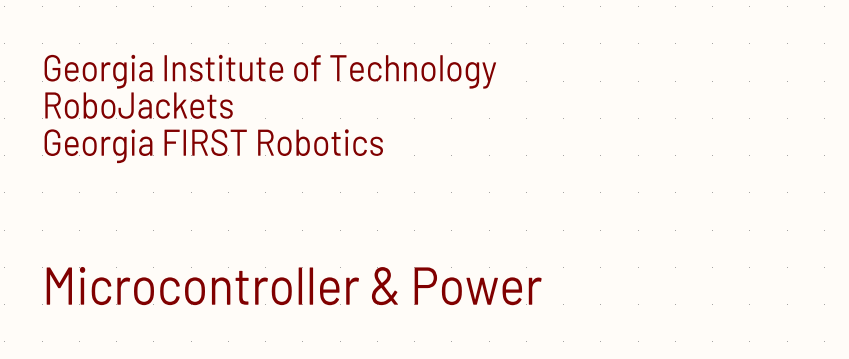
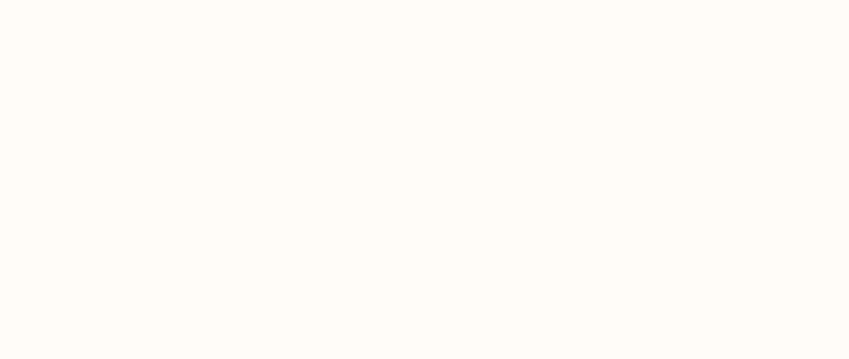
text: Georgia Institute of Technology (270, 71) -> none
text: RoboJackets (139, 105) -> none
text: Georgia FIRST Robotics (213, 146) -> none
text: Microcontroller & Power (294, 286) -> none

